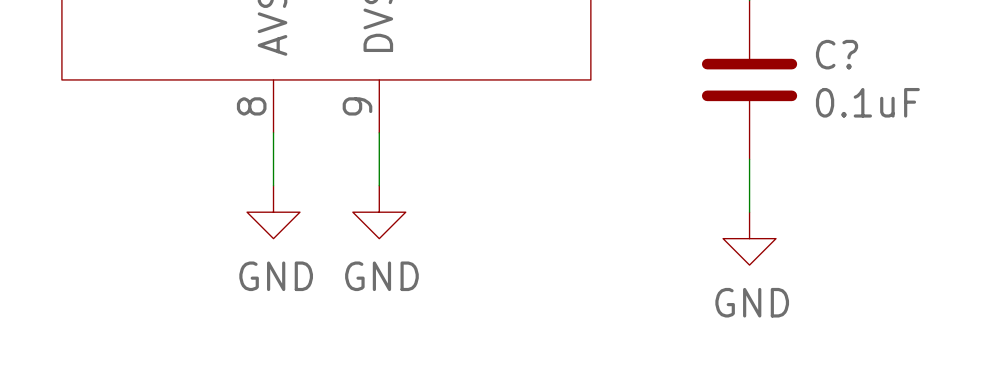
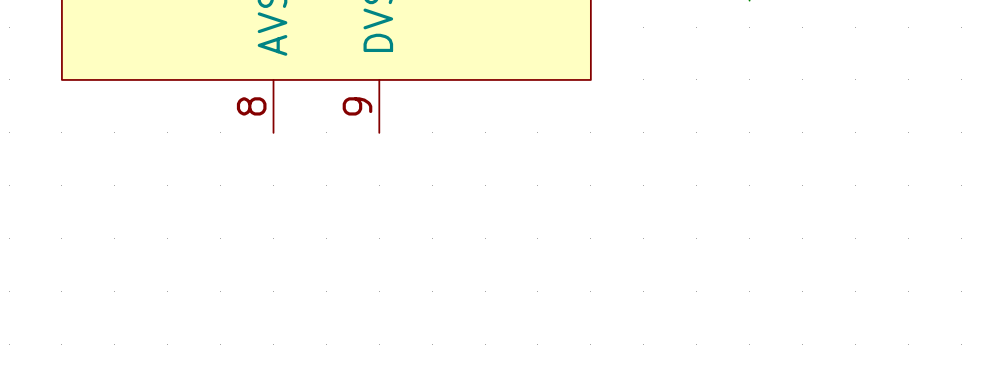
C?: 0.1uF (749, 79) -> none
wire: (273, 132) (273, 185) -> none
wire: (379, 132) (379, 185) -> none
wire: (749, 159) (749, 212) -> none
power symbol: GND (273, 212) -> none
power symbol: GND (379, 212) -> none
power symbol: GND (749, 238) -> none

